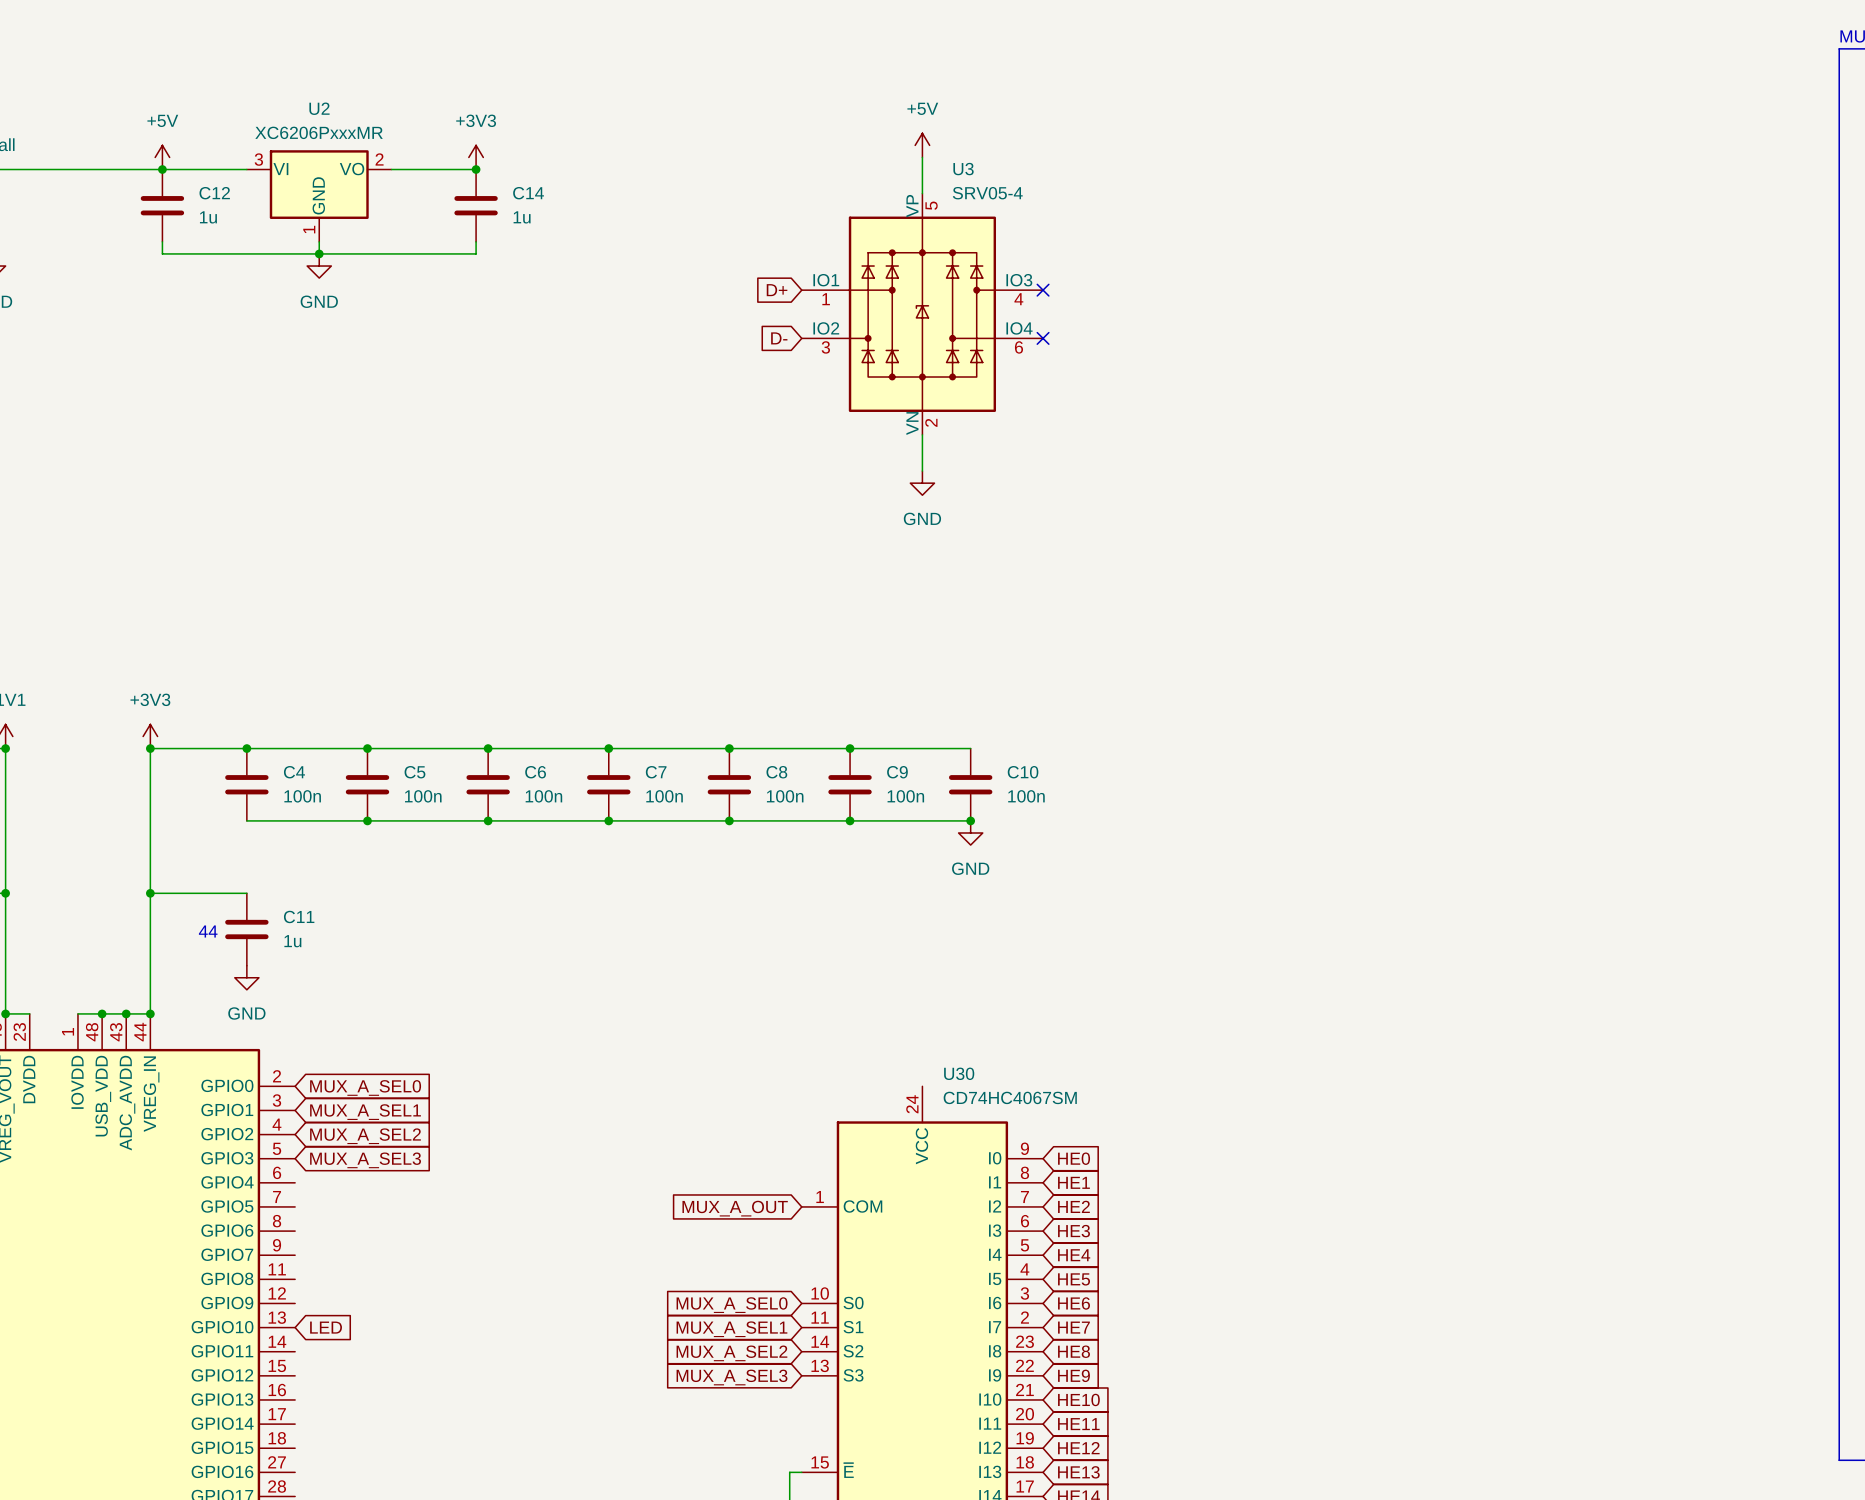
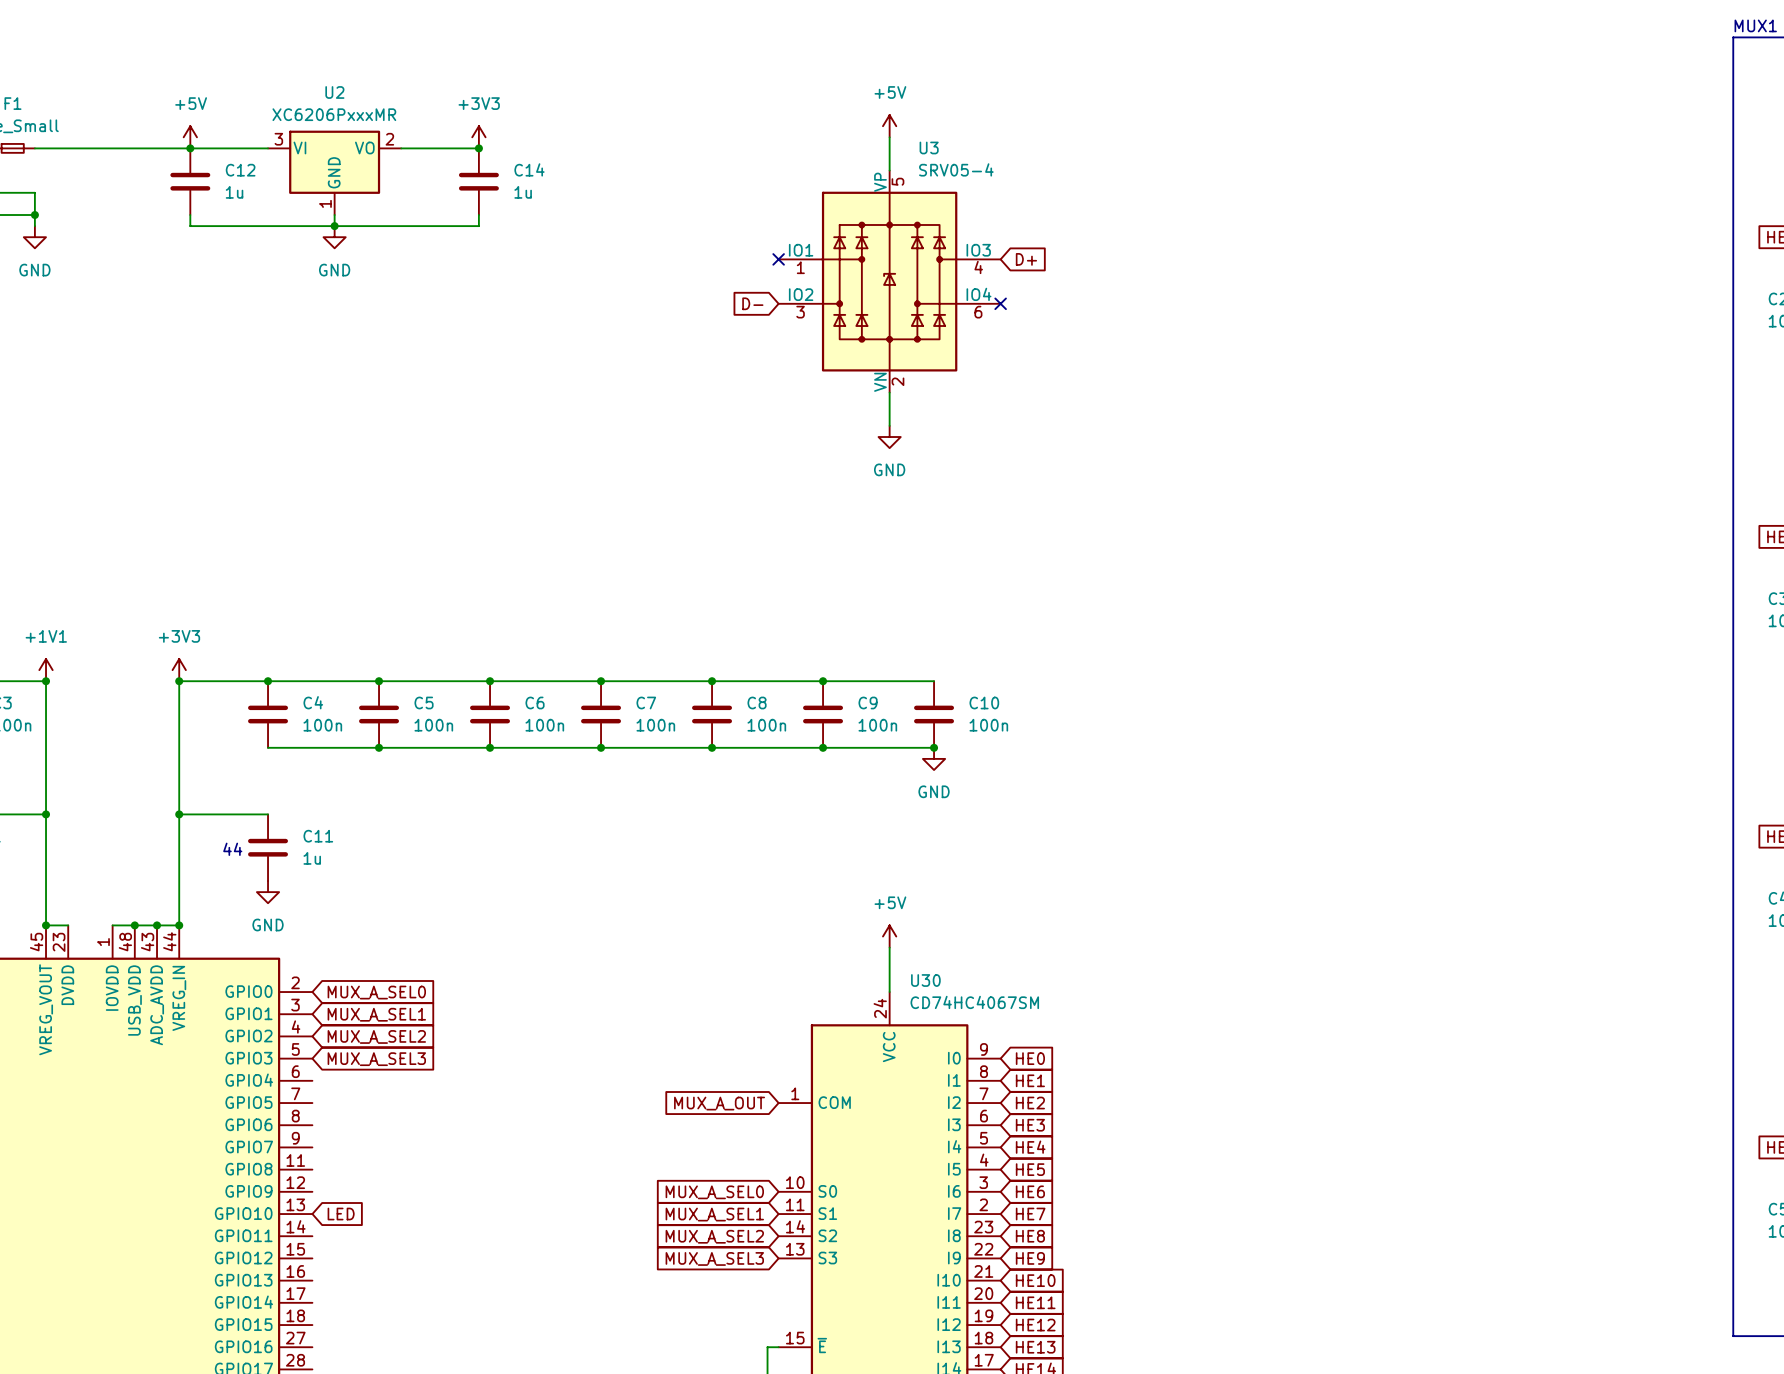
global label: D+ (777, 290) -> none
no-connect mark: none -> (778, 259)
no-connect mark: (1043, 290) -> none
global label: none -> D+ (1026, 259)
power symbol: none -> +5V (889, 936)
wire: none -> (889, 947) (889, 992)

